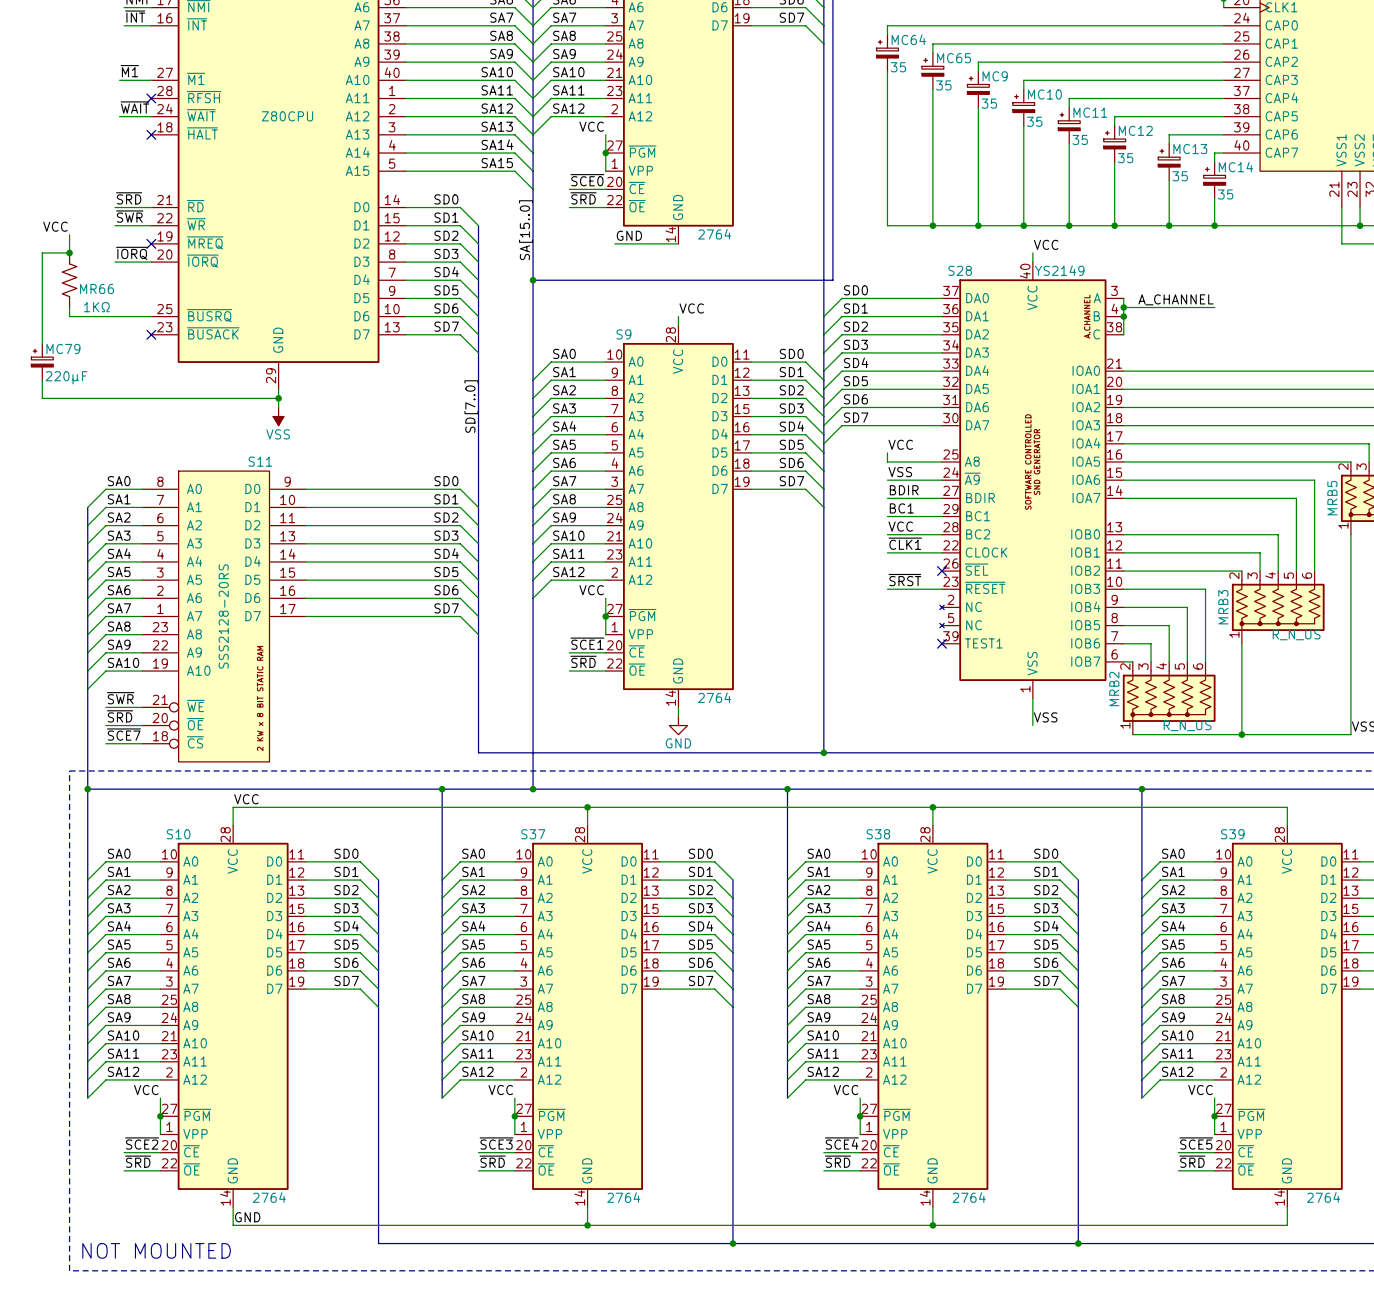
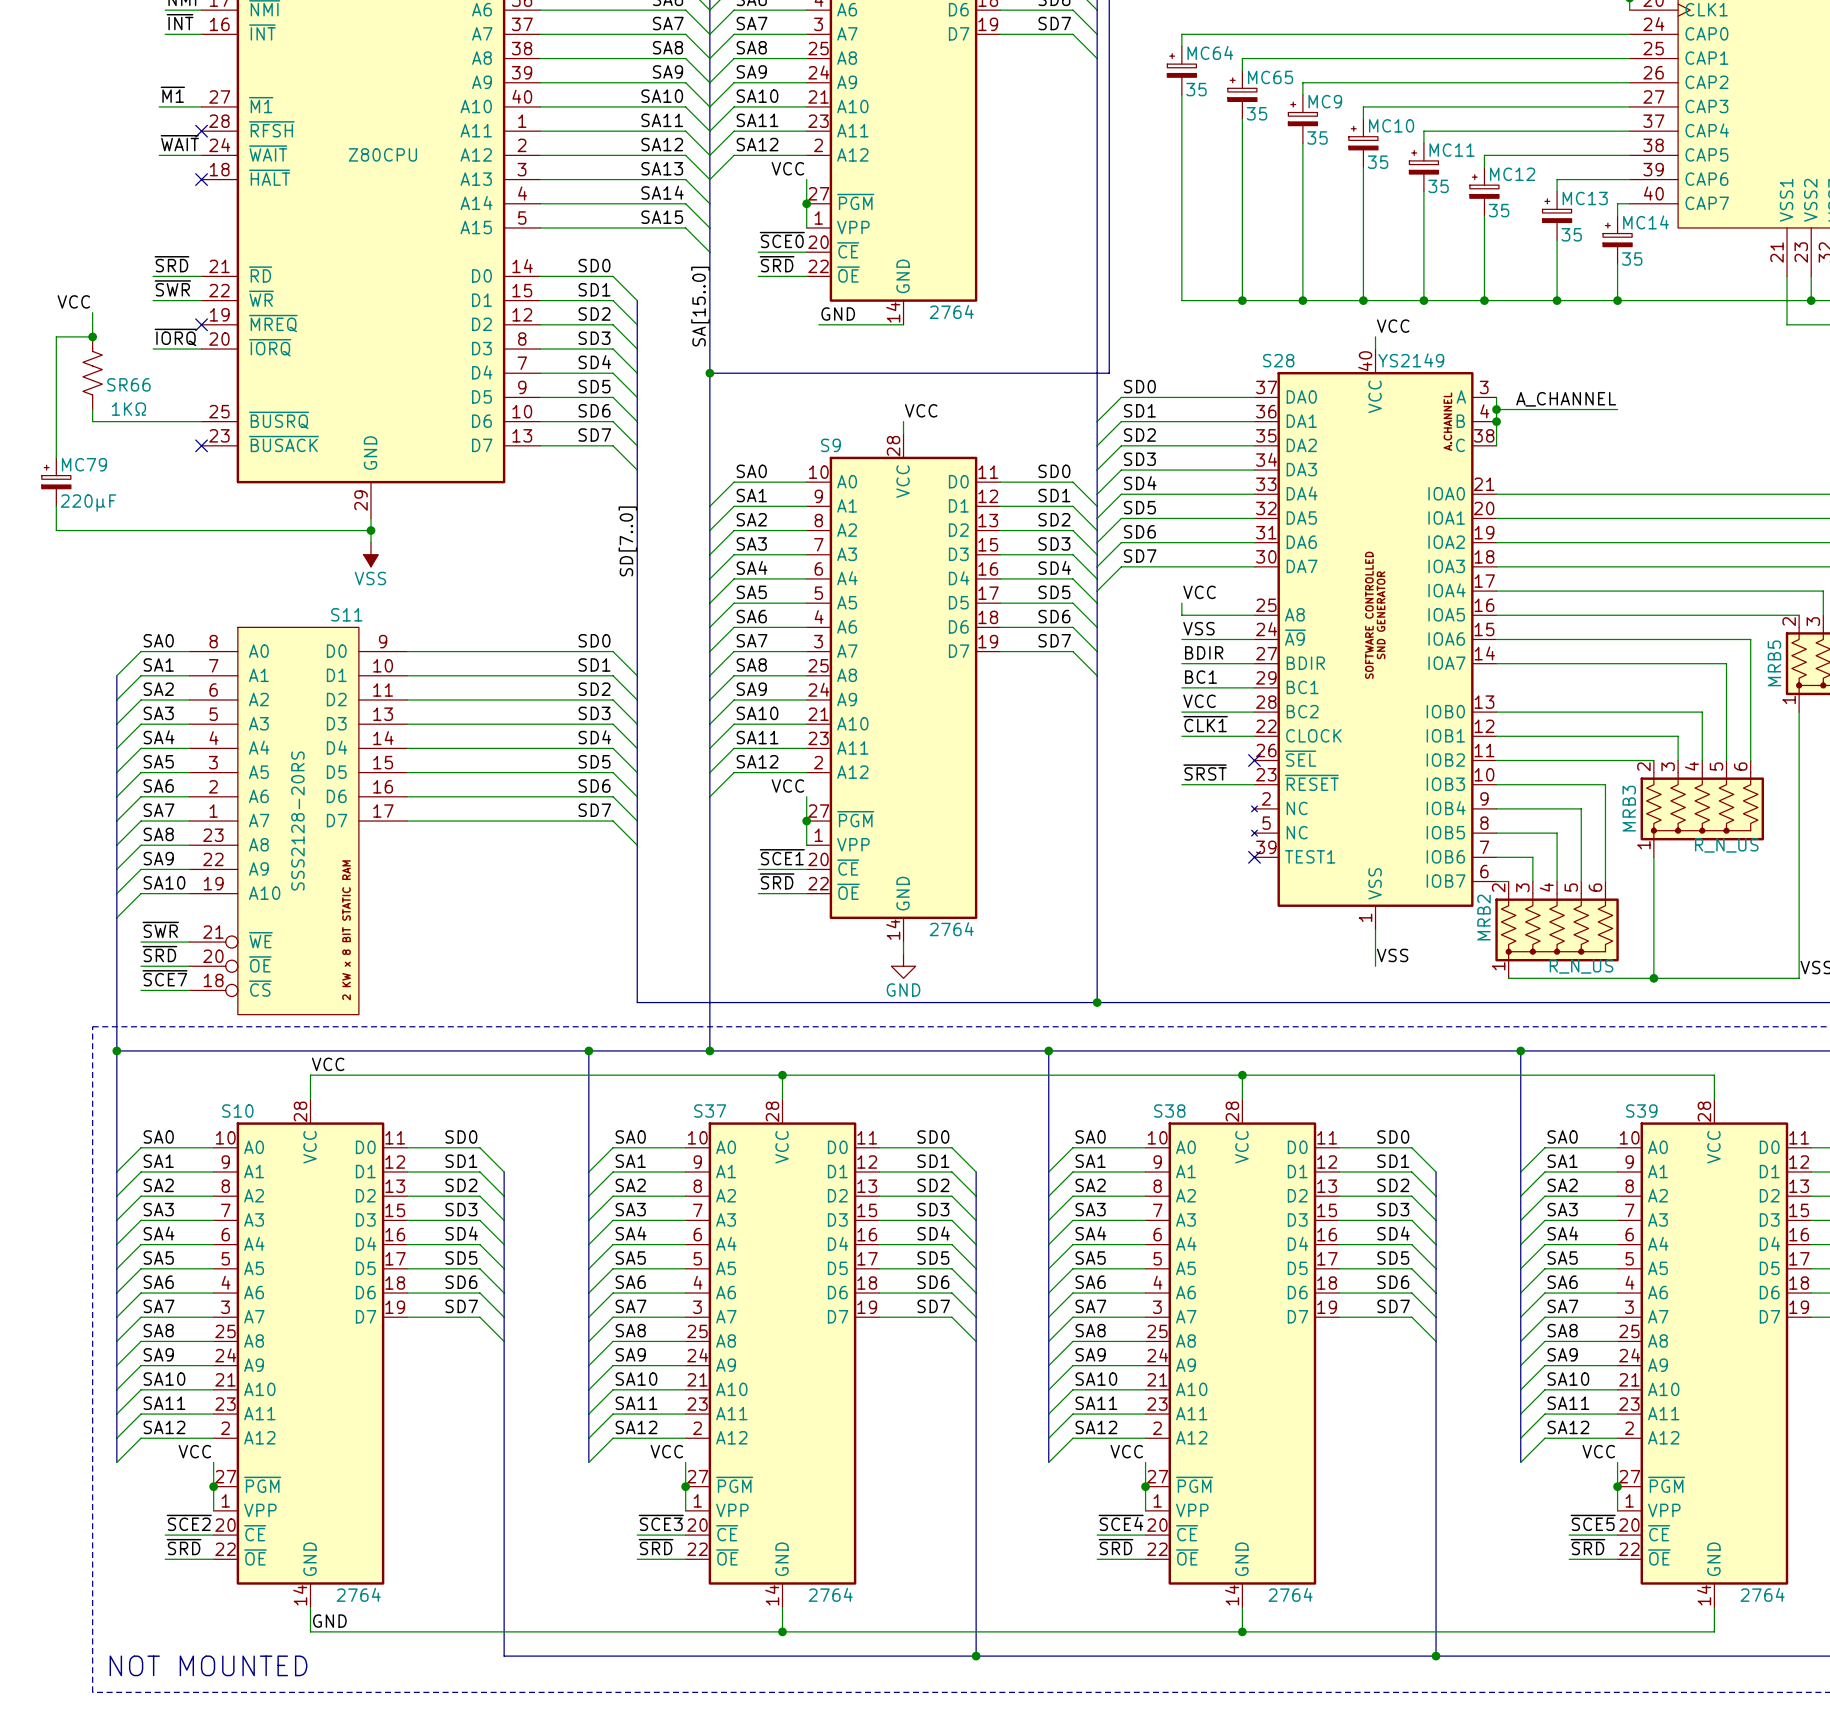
MR66 name: MR66 (97, 288) -> SR66 (128, 384)

